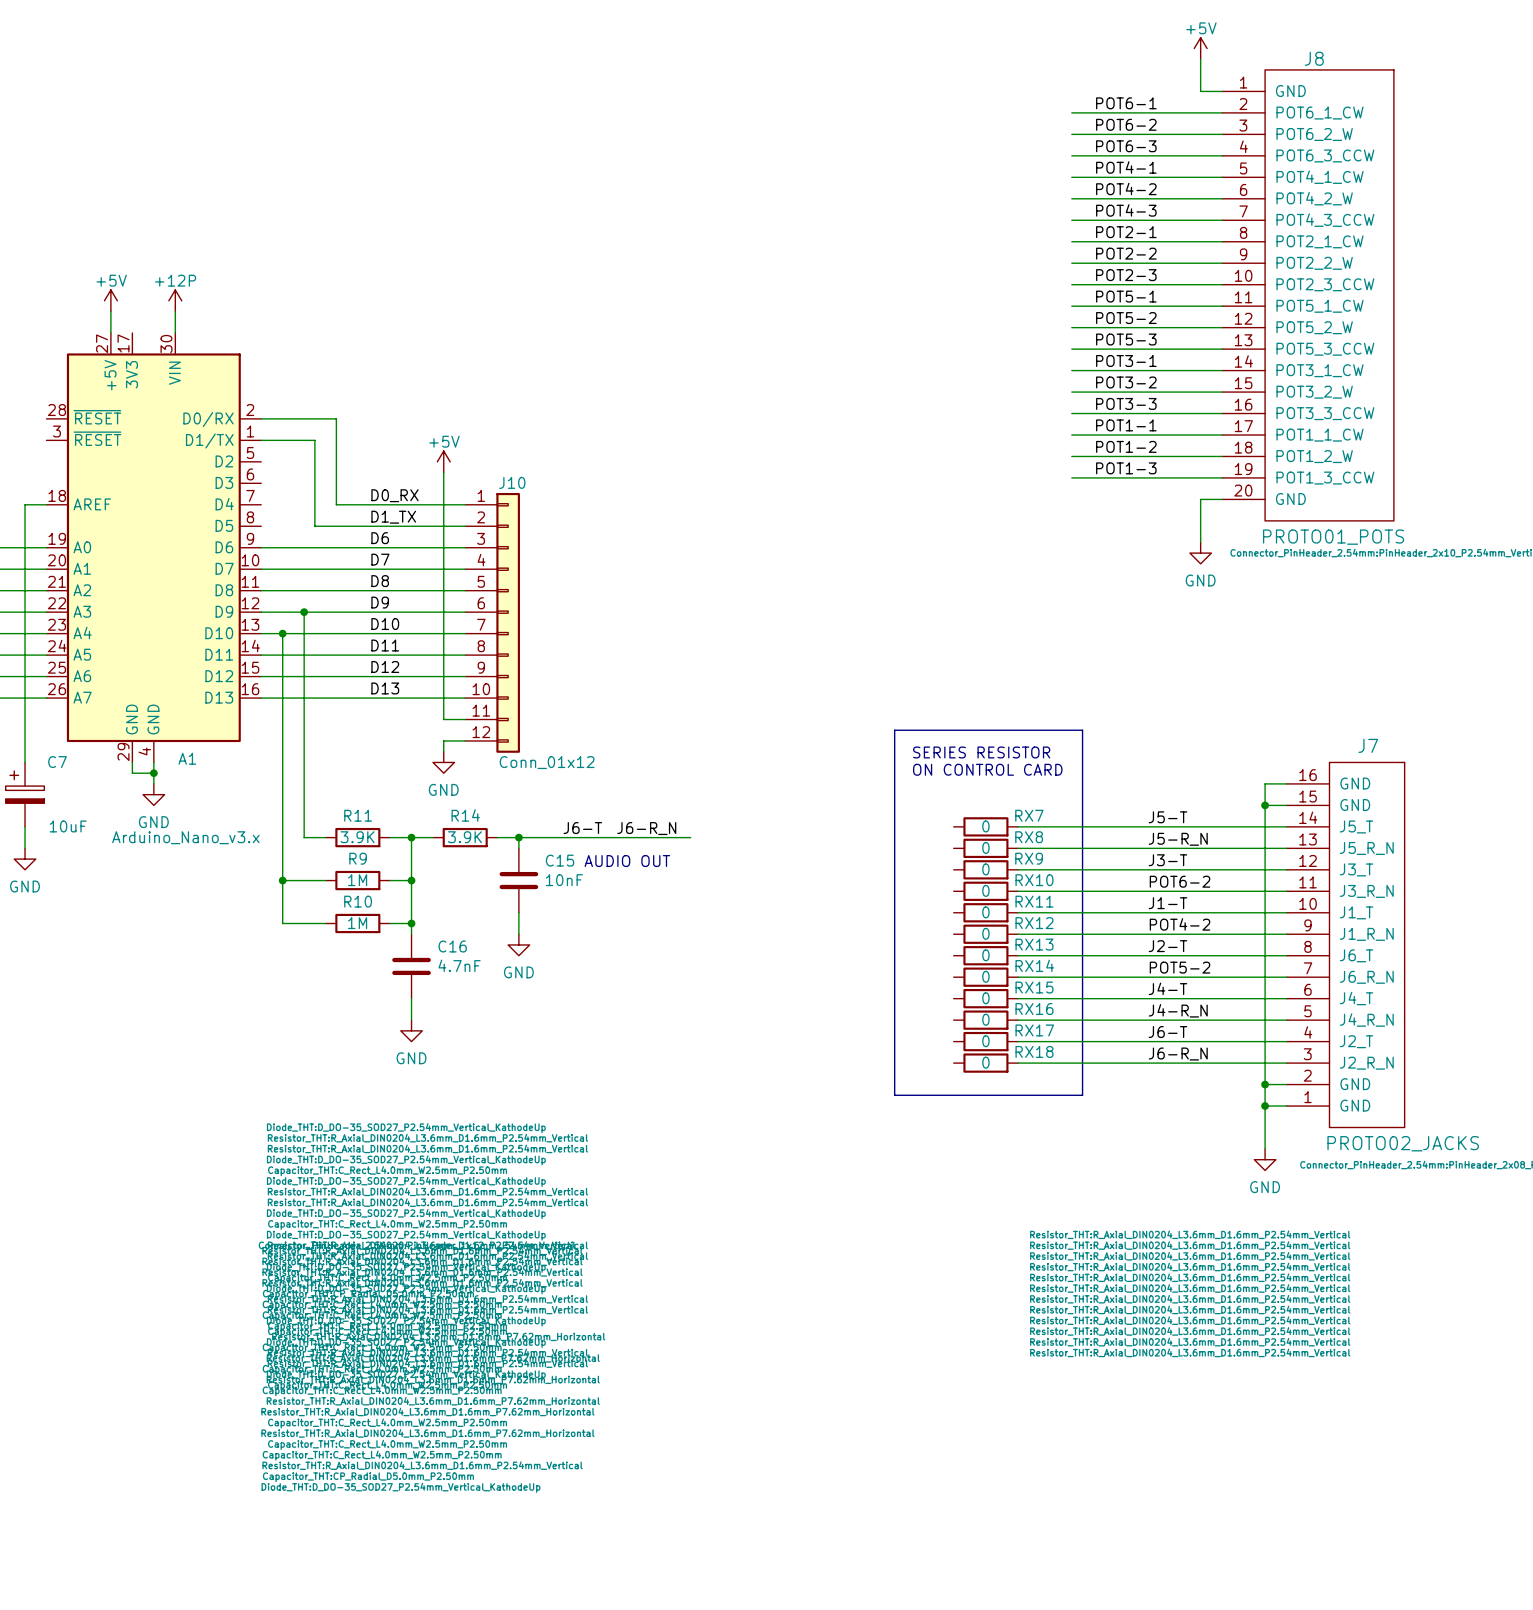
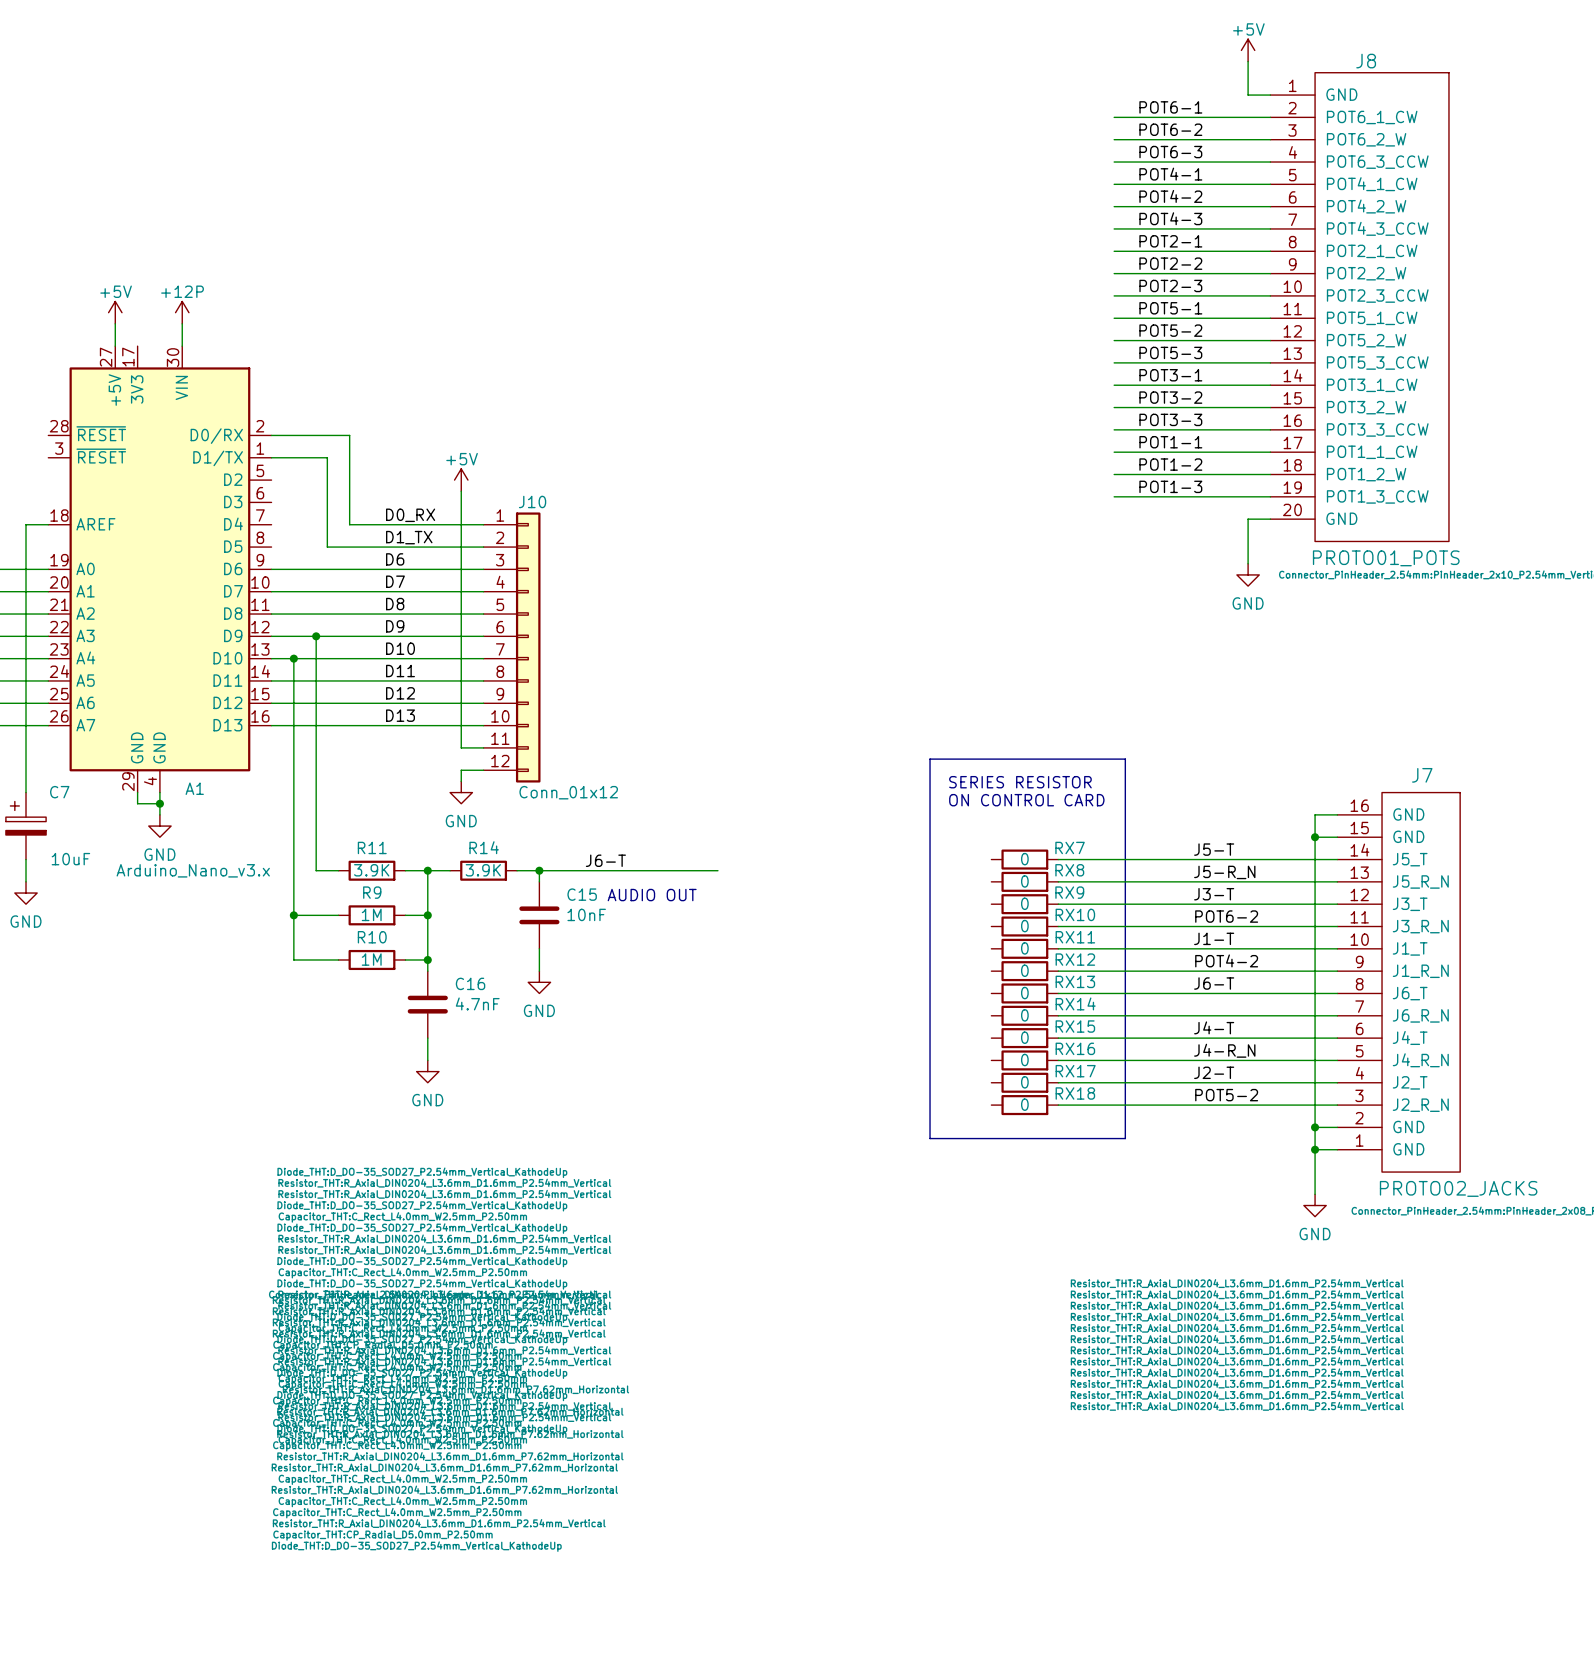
label: J6-R_N (646, 828) -> none
label: J2-T (1168, 946) -> J6-T (1214, 983)
label: POT5-2 (1180, 967) -> none
label: J6-T (1168, 1032) -> J2-T (1214, 1072)
label: J6-R_N (1178, 1054) -> POT5-2 (1226, 1095)

